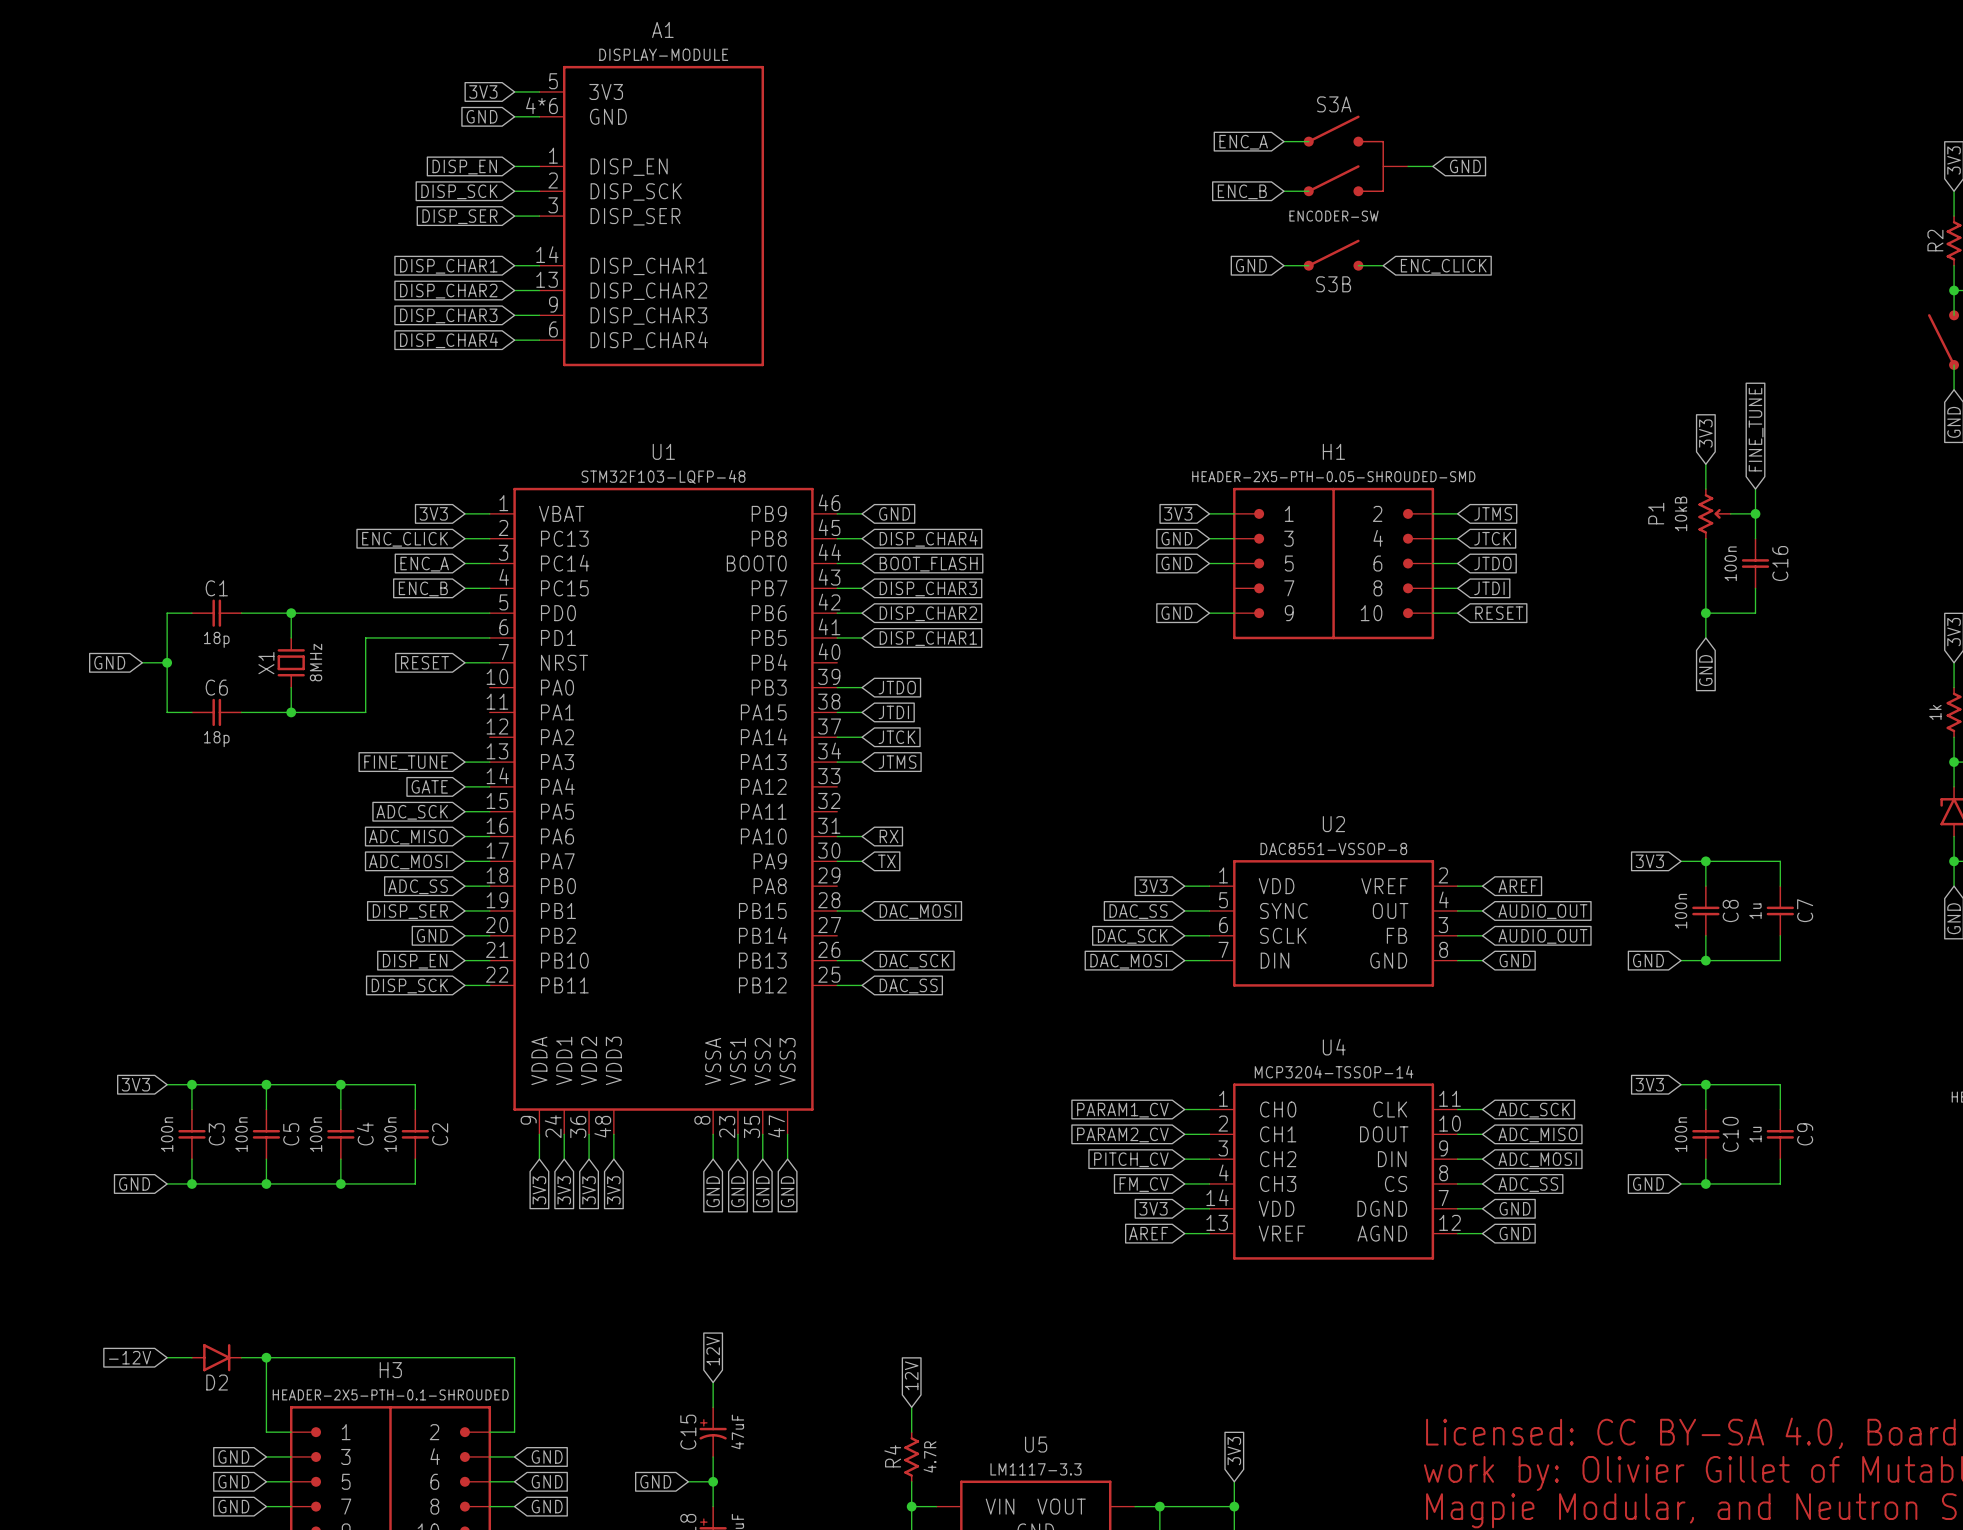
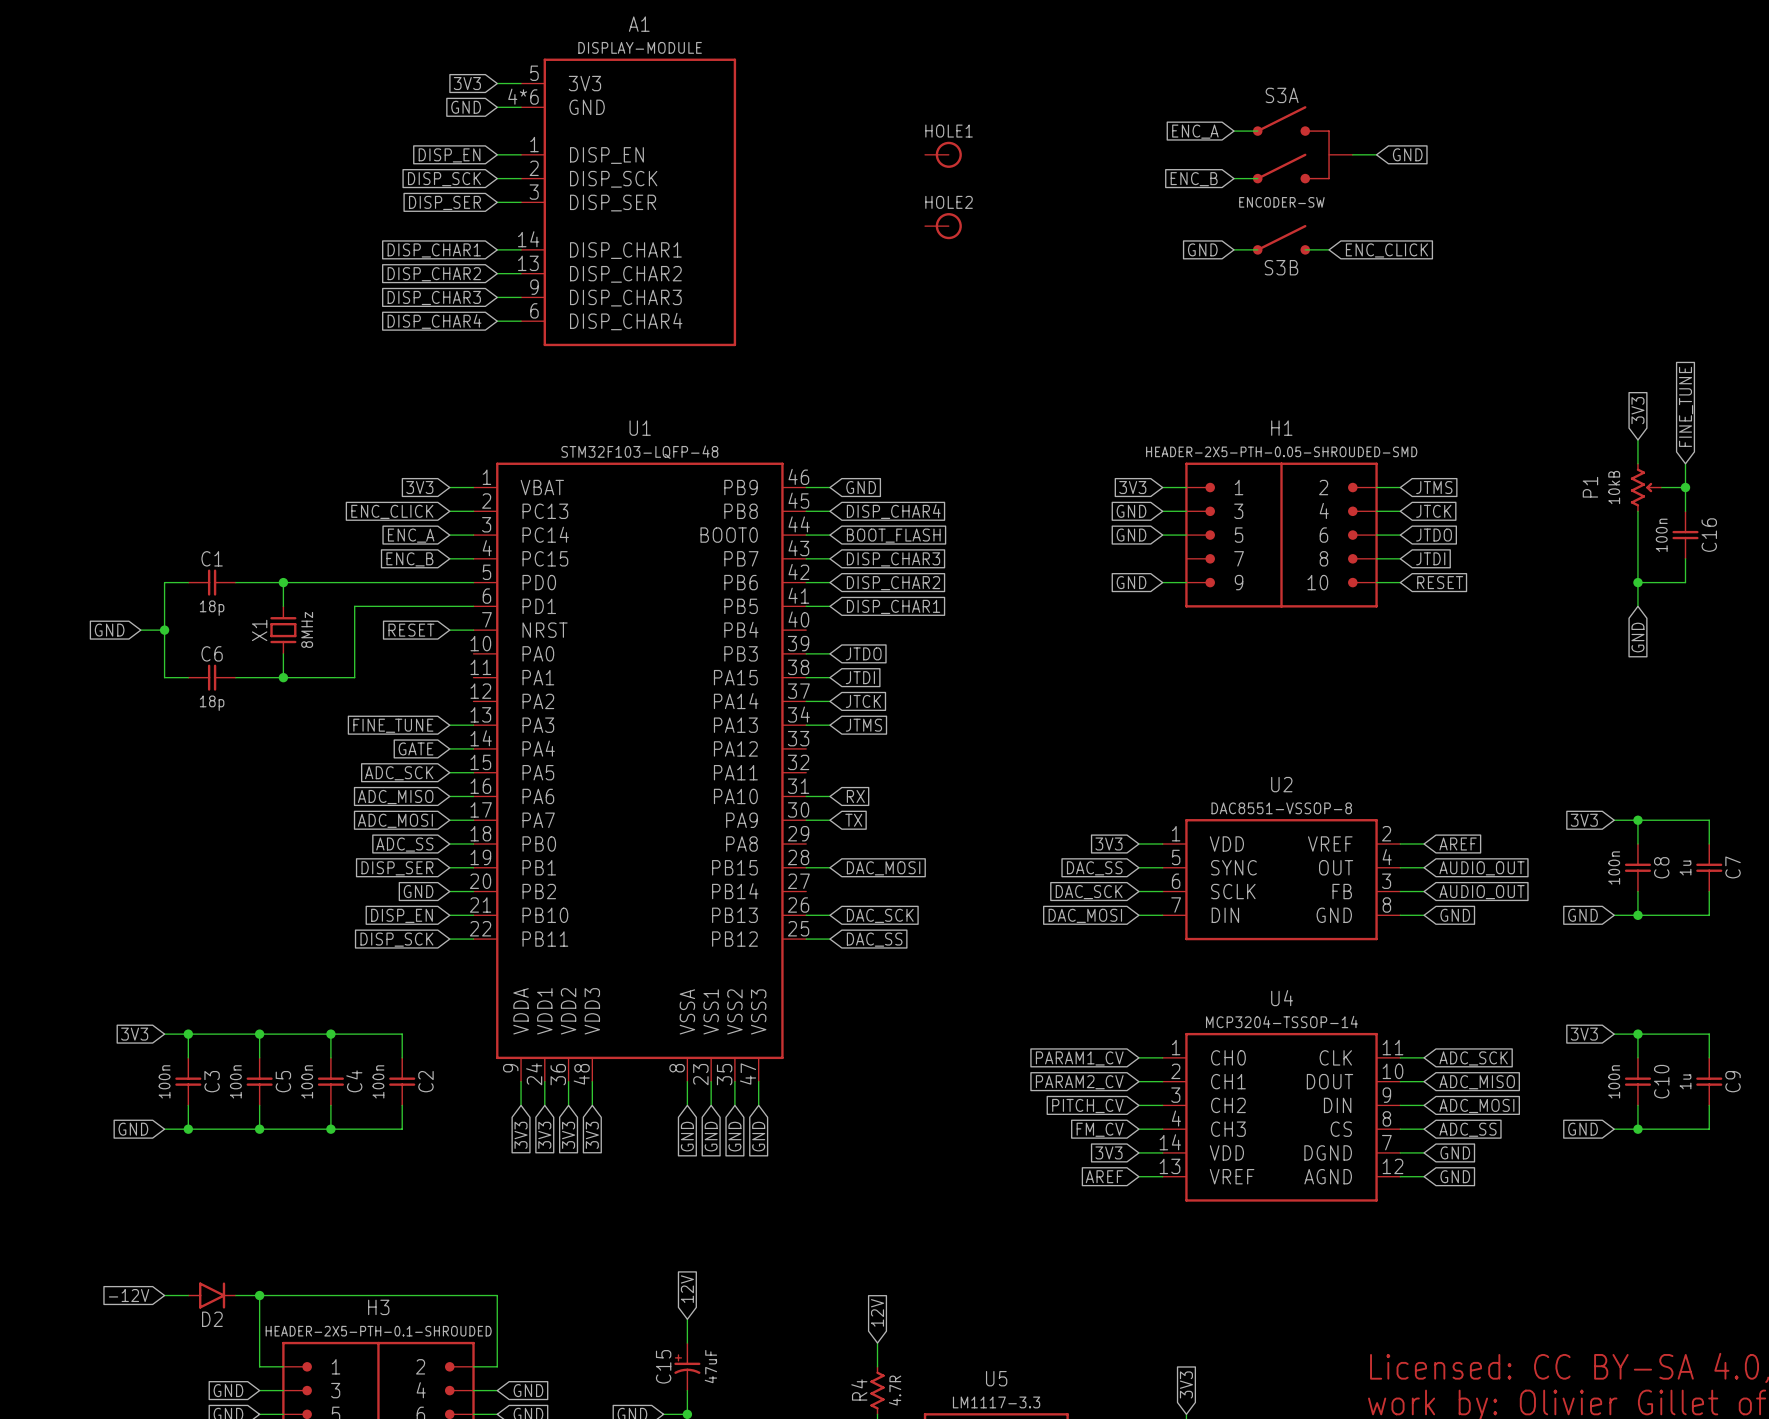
HOLE1: none -> (943, 154)
HOLE2: none -> (943, 226)

